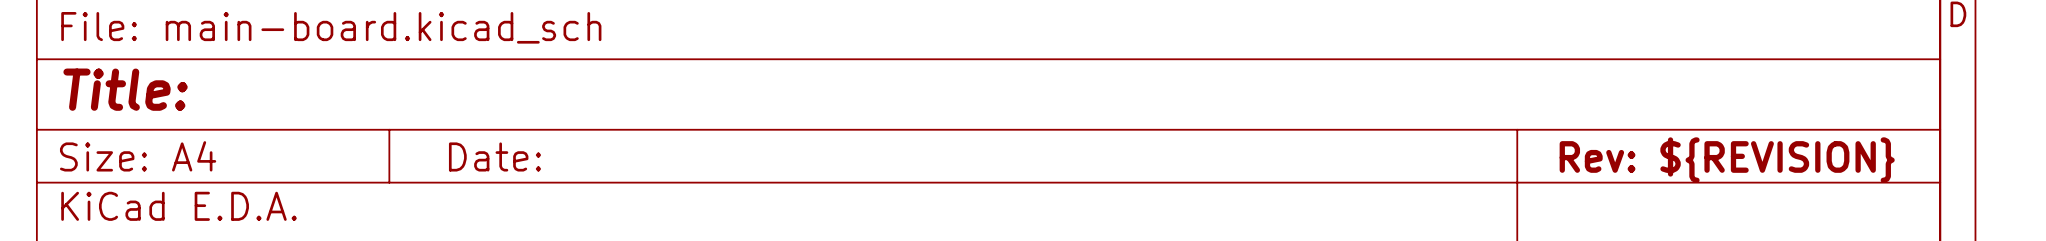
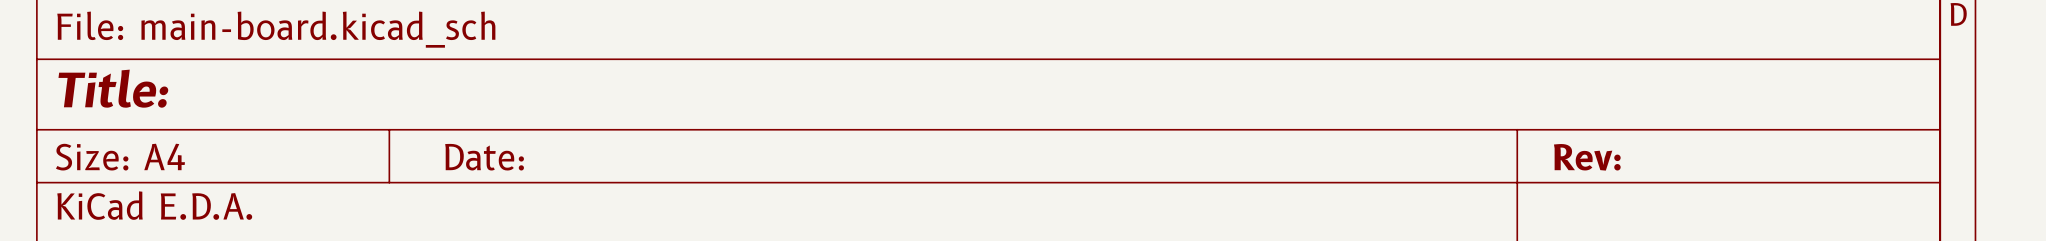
title block: Rev: ${REVISION} (1727, 160) -> Rev: (1587, 157)

